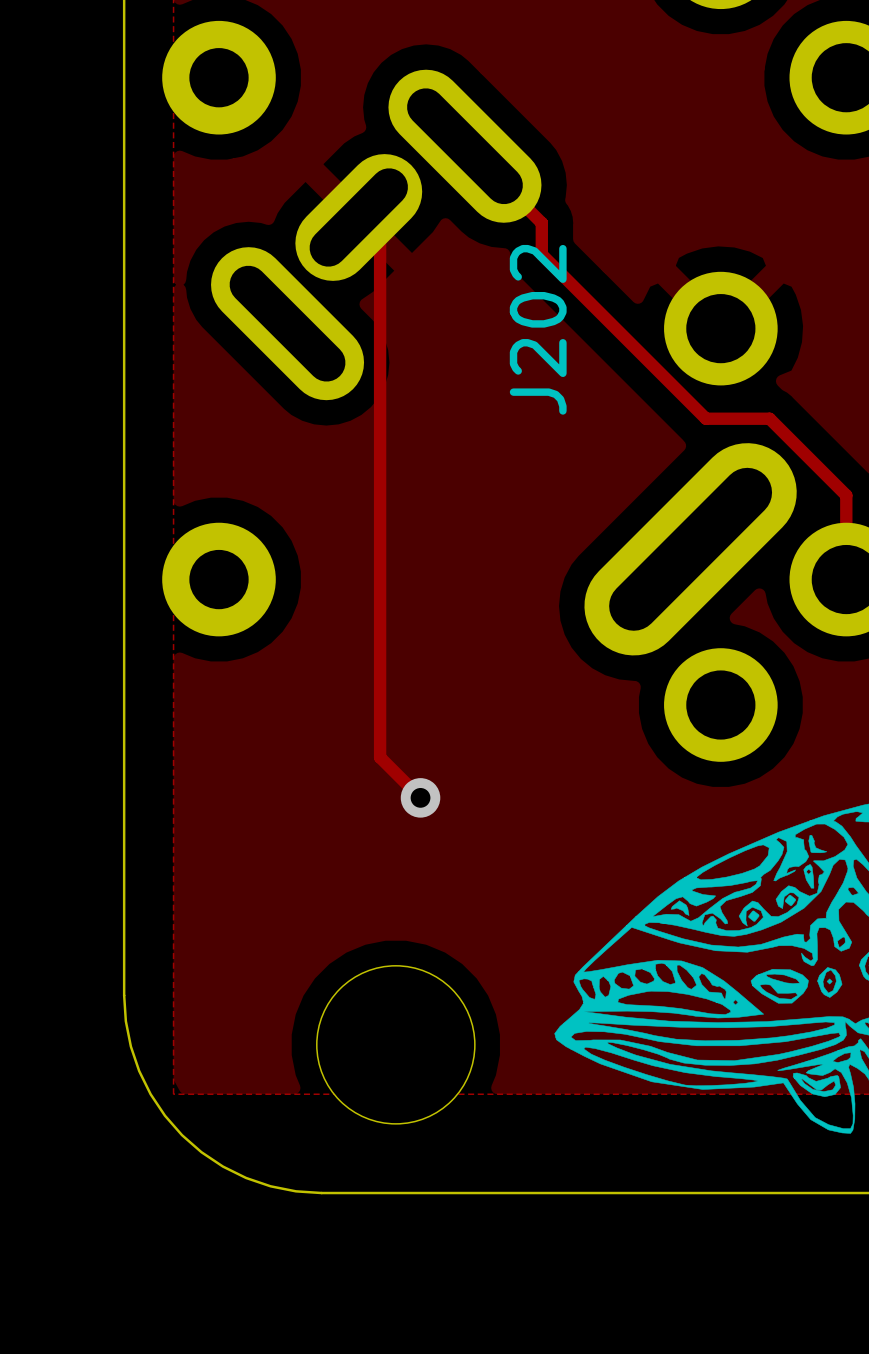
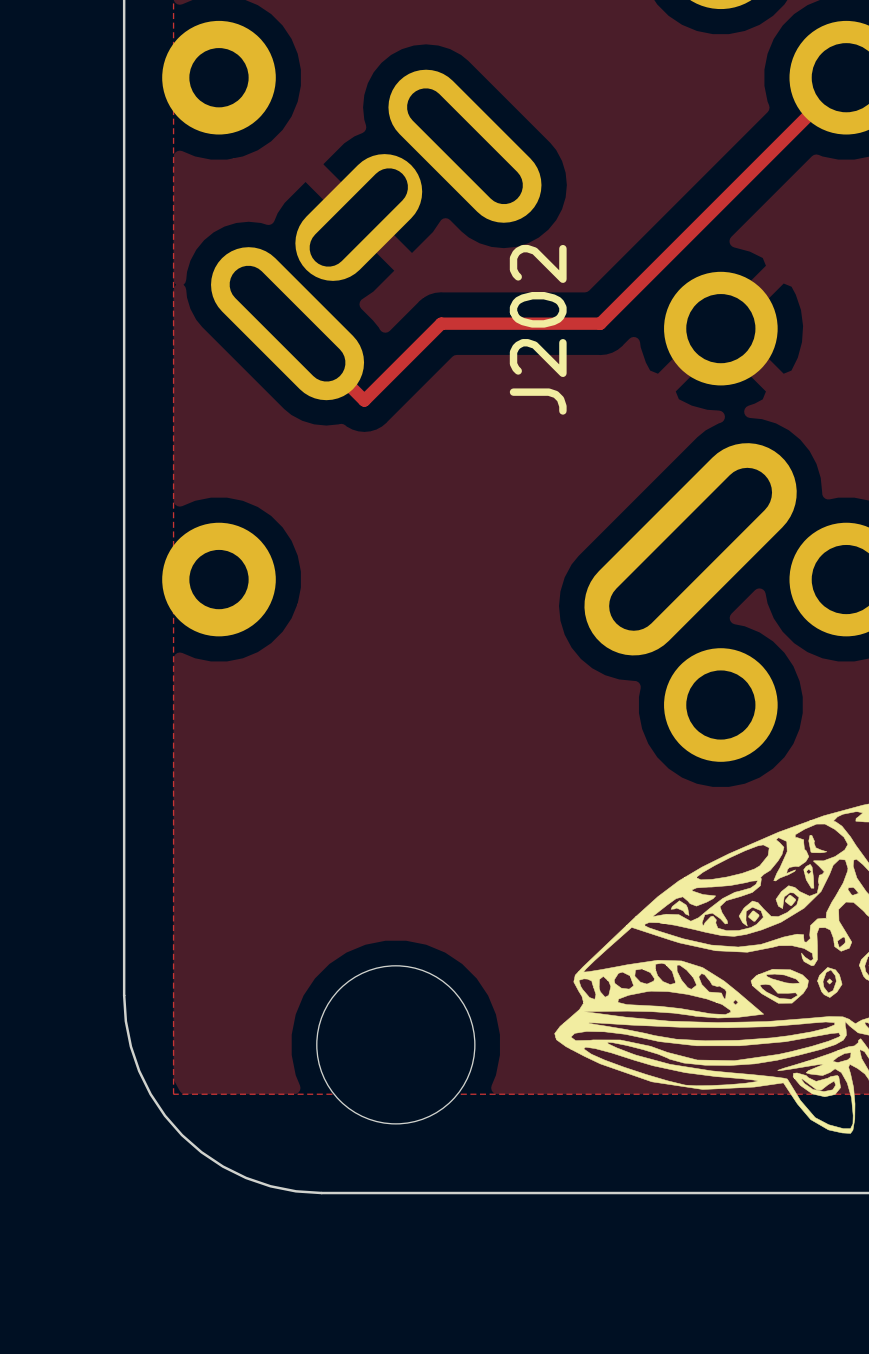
track: none -> (846, 77) (600, 323) (441, 323) (364, 400) (287, 323)
track: (464, 146) (541, 223) (541, 254) (706, 418) (769, 418) (846, 495) (846, 579) -> none
track: (358, 217) (380, 238) (380, 757) (420, 797) -> none
via: (420, 797) -> none

